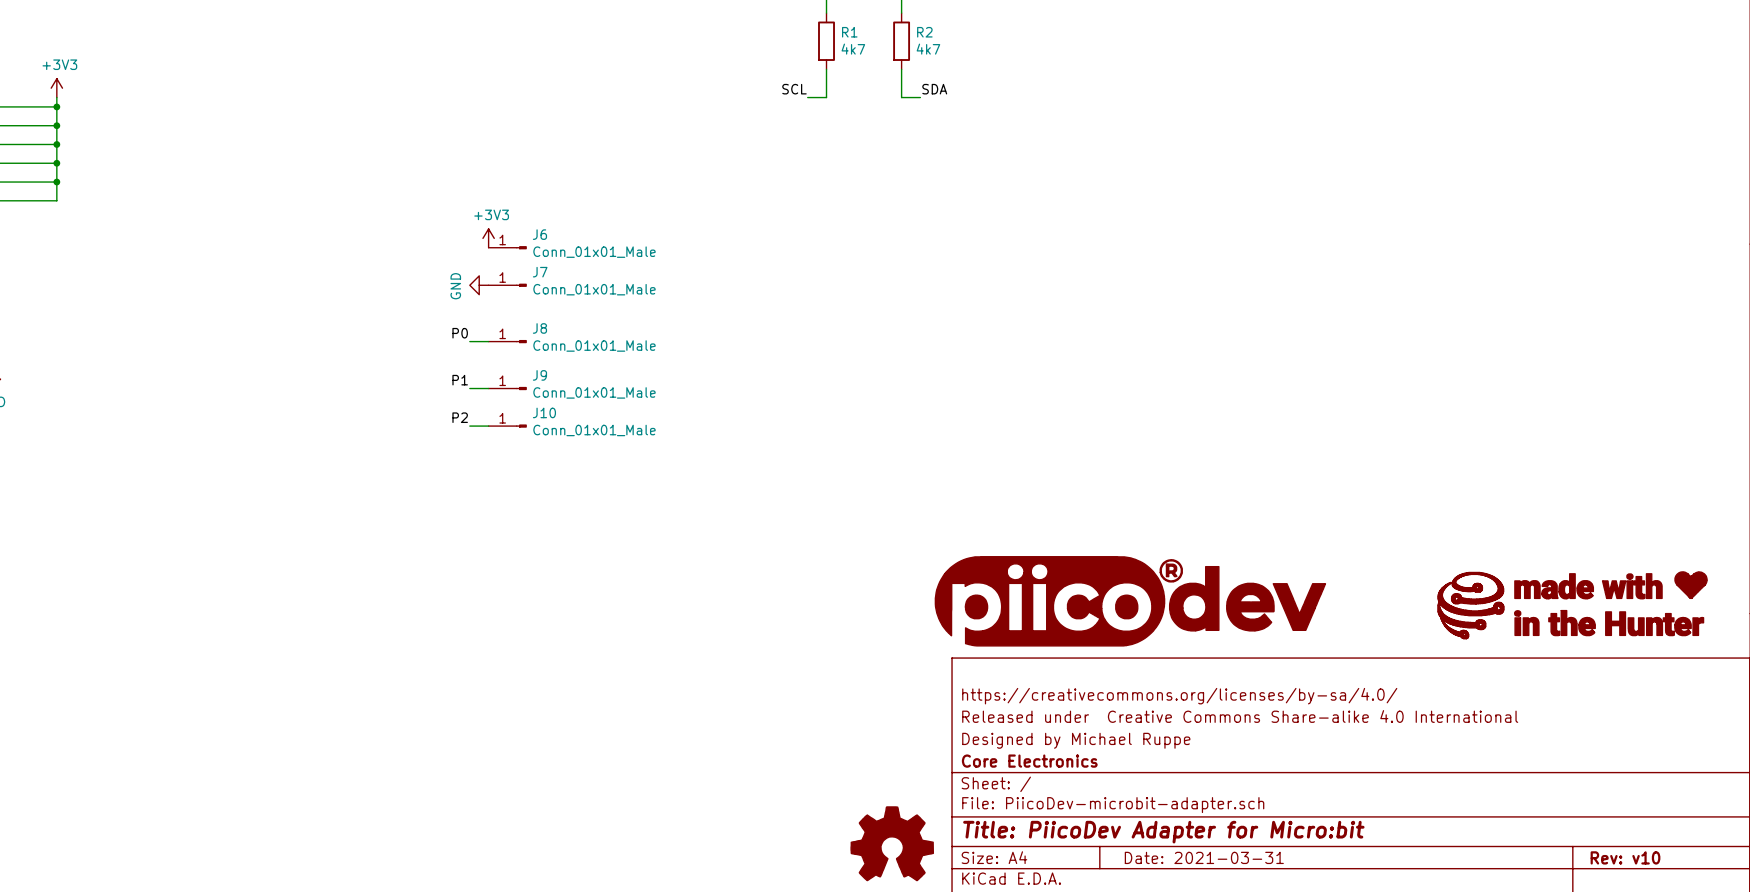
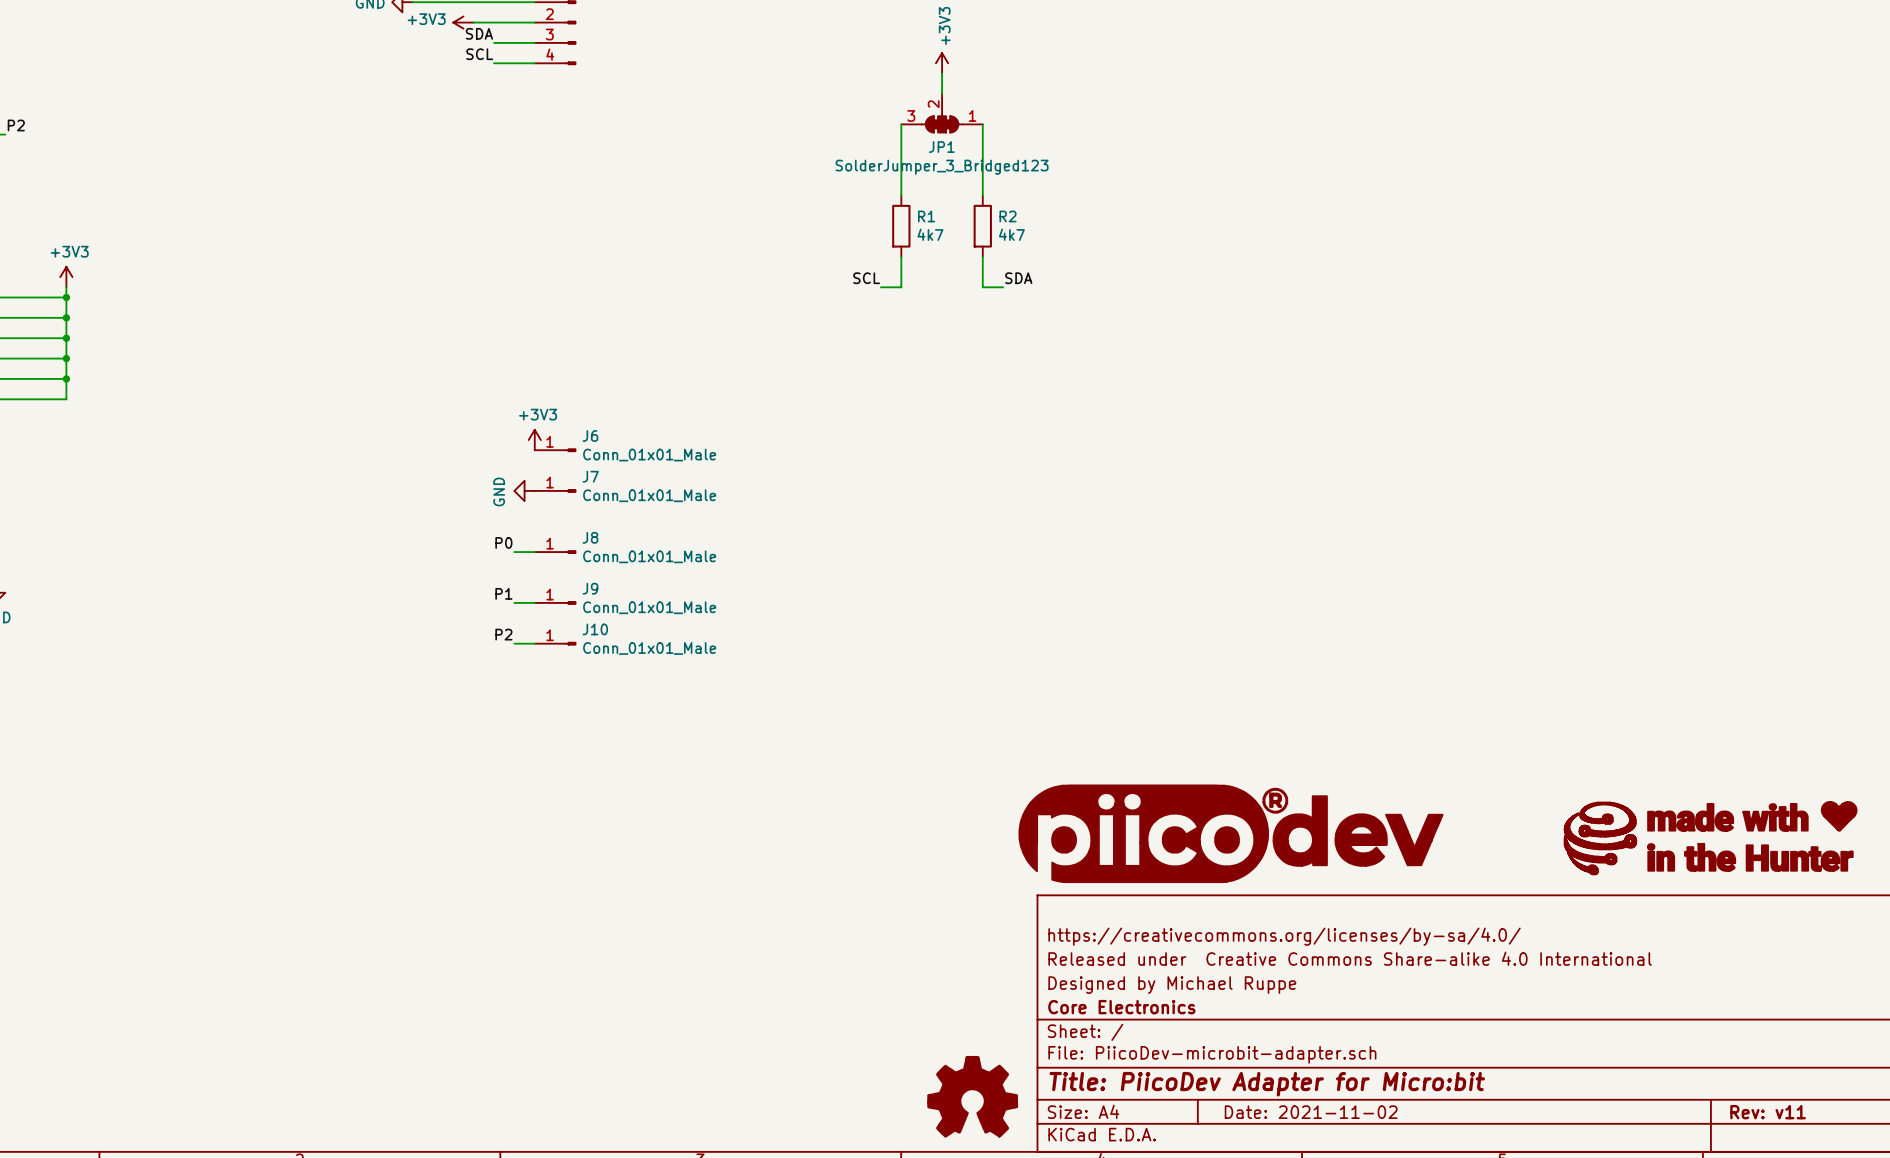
title block: Date: 2021-03-31 (1204, 857) -> Date: 2021-11-02 (1311, 1112)
title block: Rev: v10 (1625, 857) -> Rev: v11 (1768, 1112)

